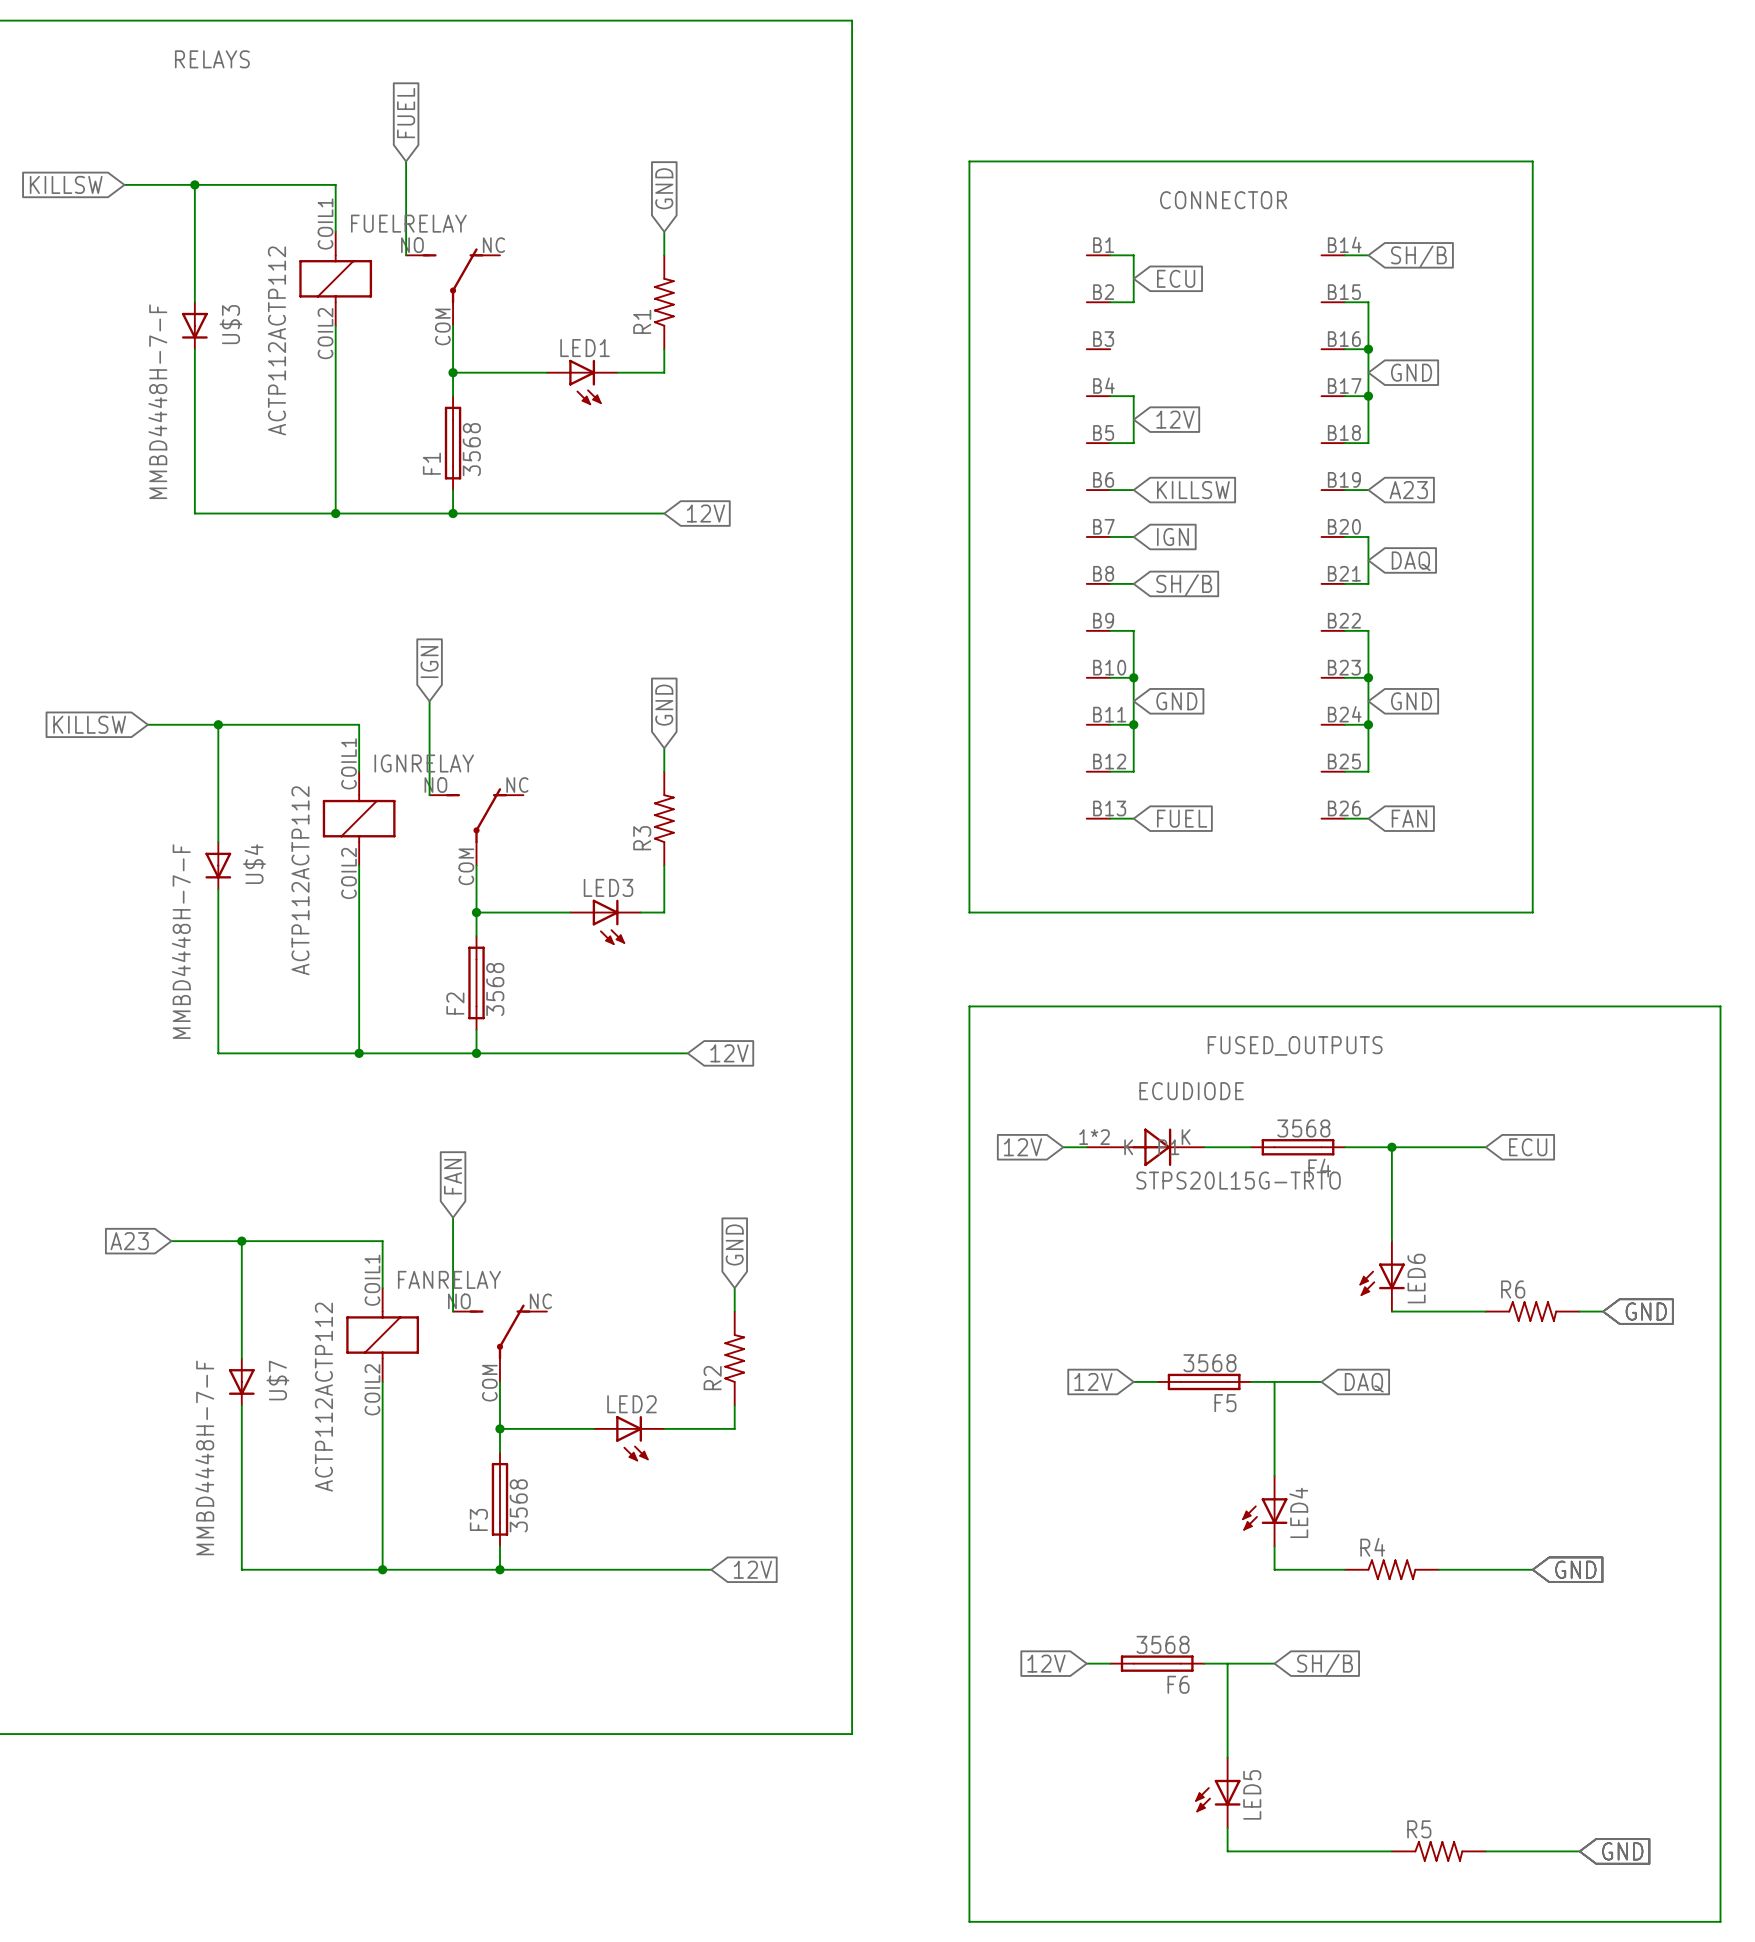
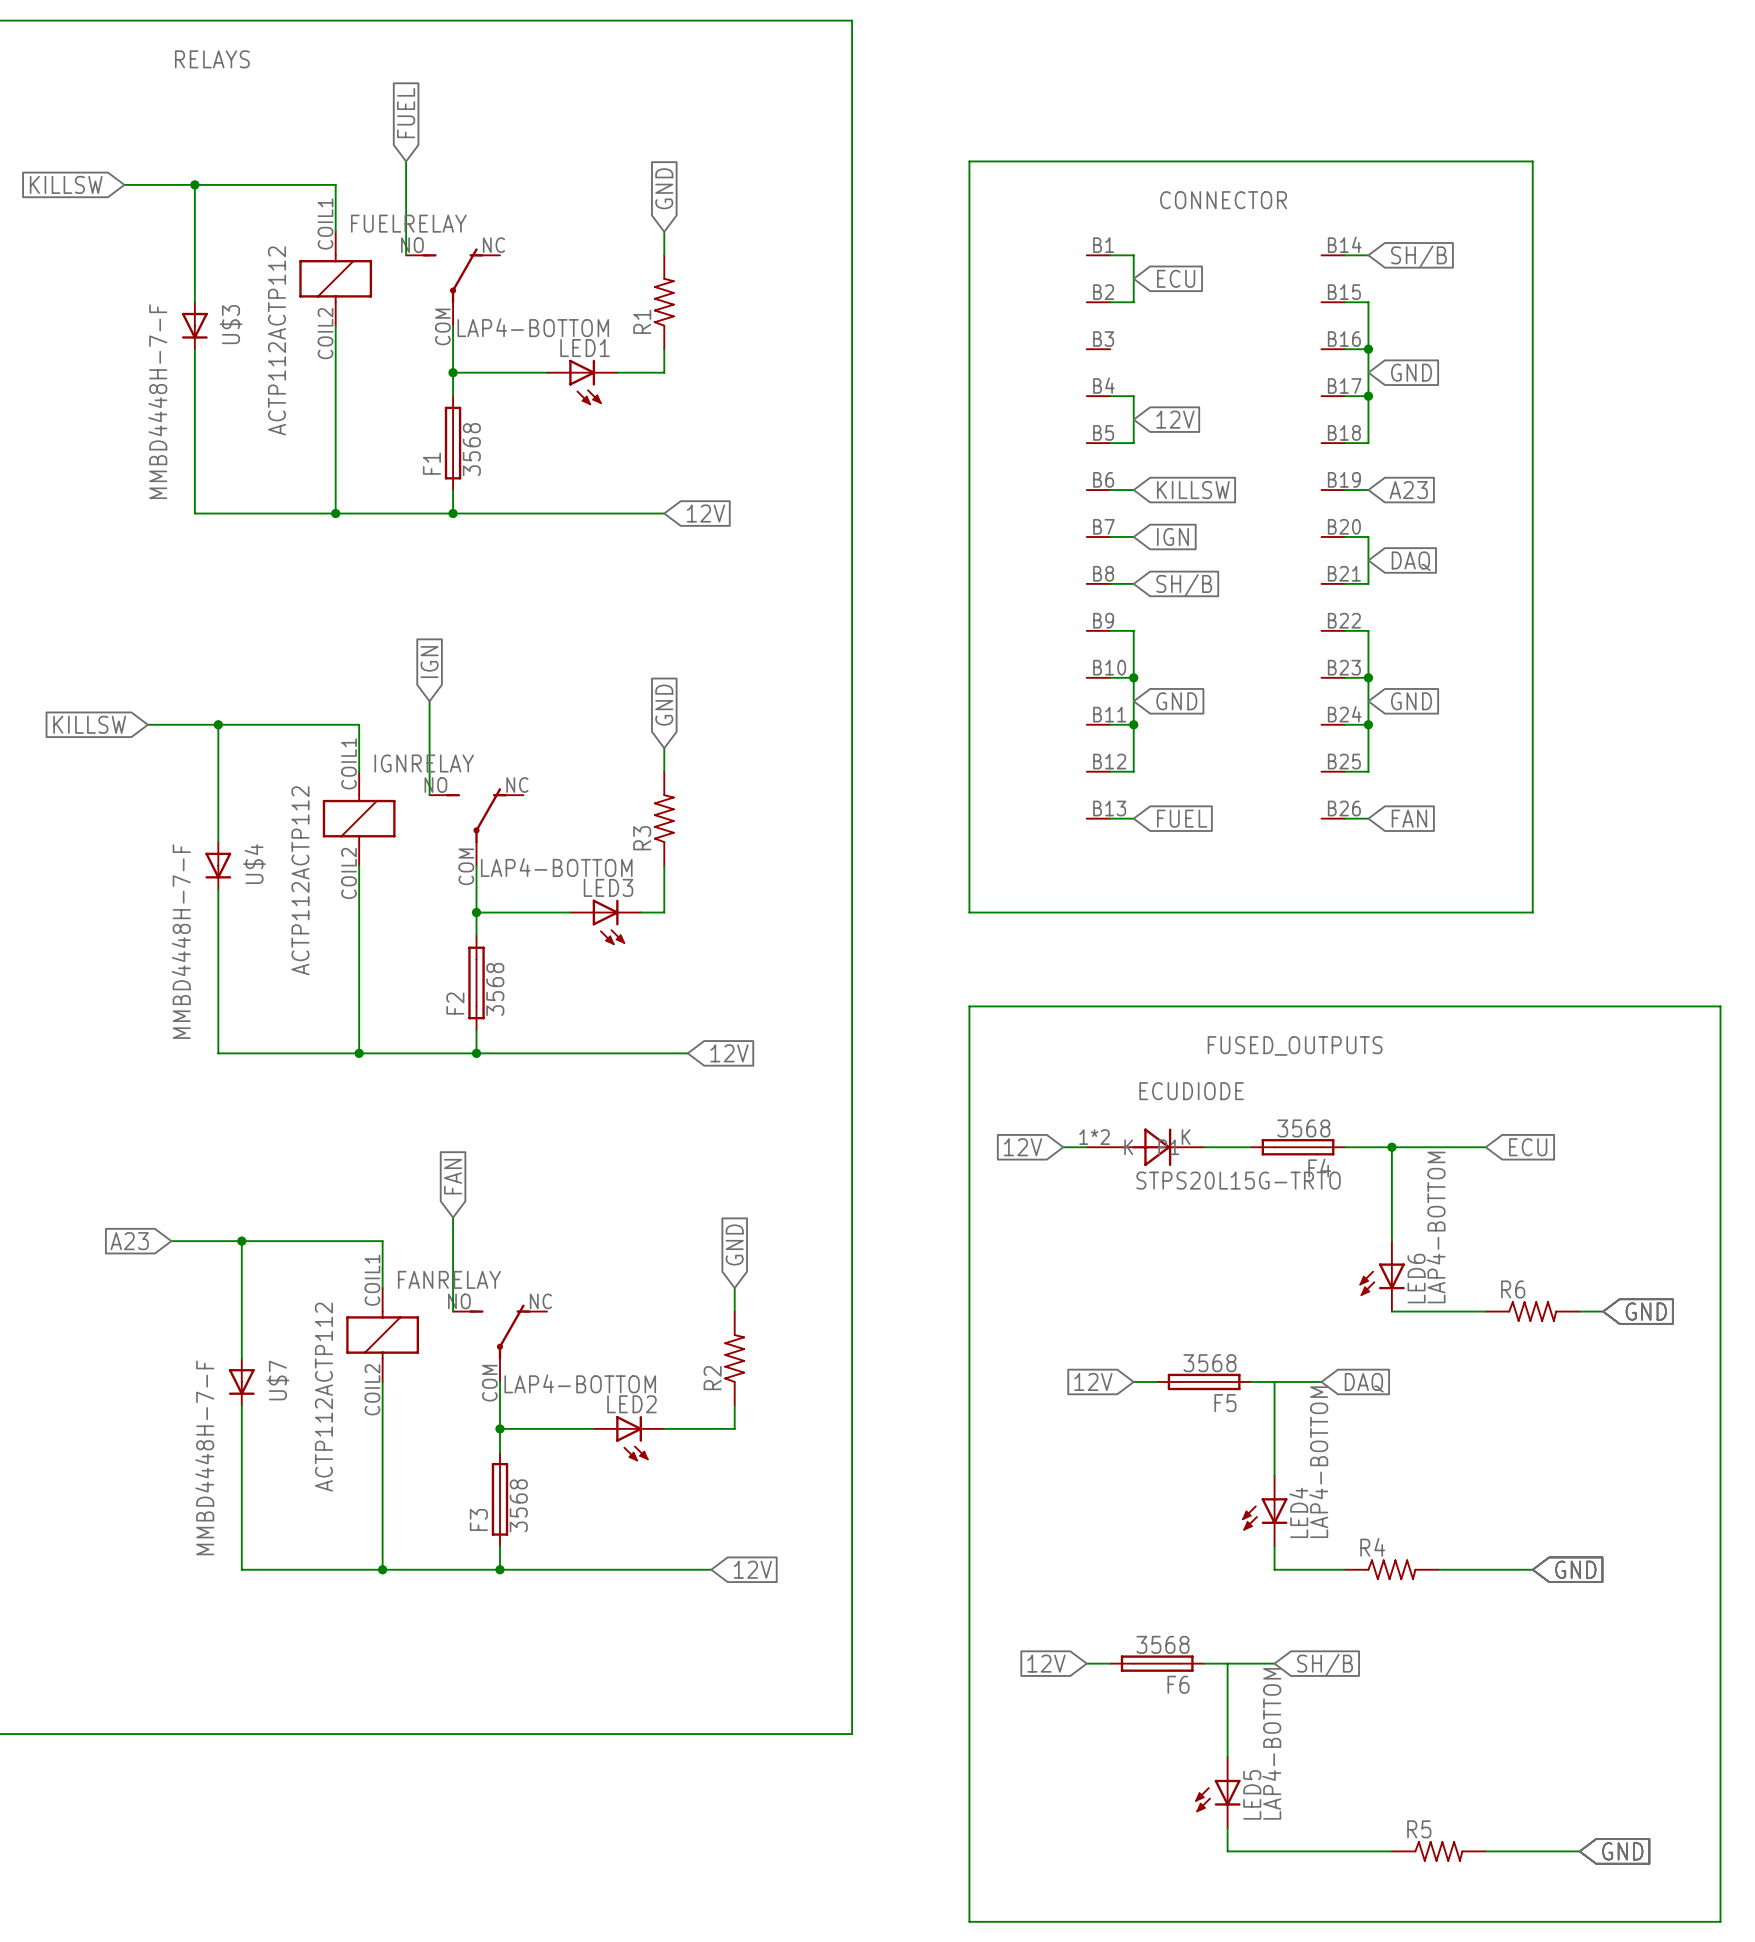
LED1 value: none -> LAP4-BOTTOM (533, 327)
LED3 value: none -> LAP4-BOTTOM (556, 867)
LED6 value: none -> LAP4-BOTTOM (1436, 1227)
LED2 value: none -> LAP4-BOTTOM (580, 1383)
LED4 value: none -> LAP4-BOTTOM (1318, 1462)
LED5 value: none -> LAP4-BOTTOM (1271, 1743)

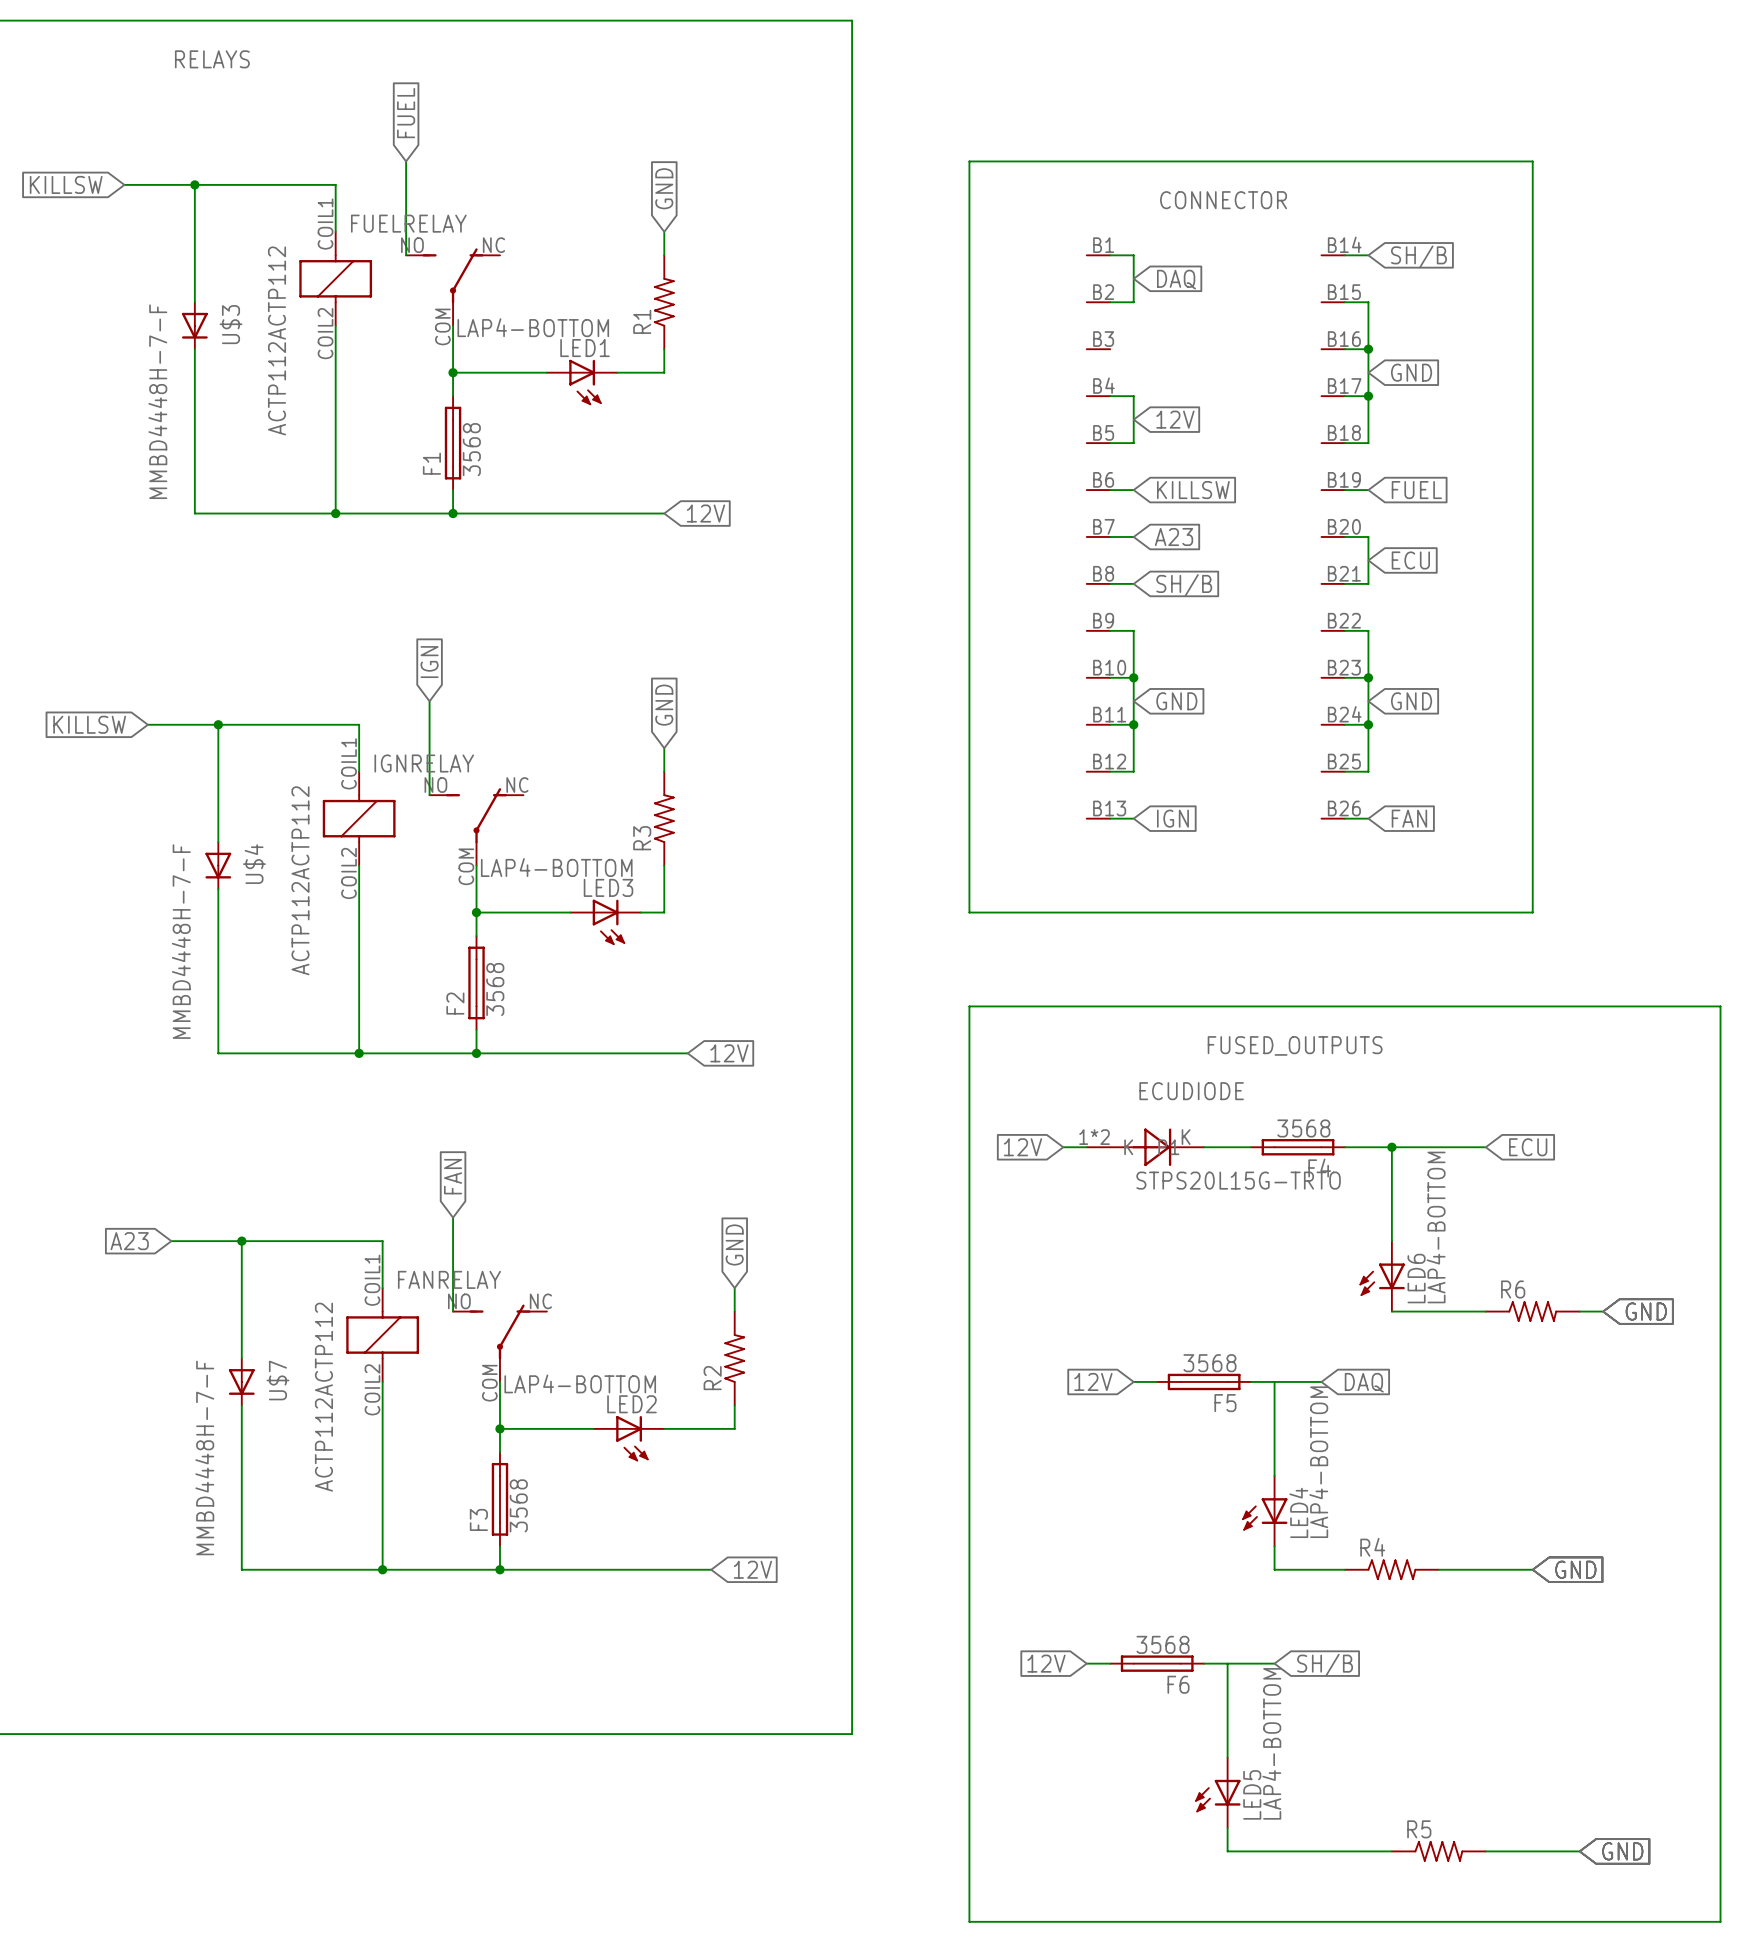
global label: ECU (1176, 278) -> DAQ (1176, 279)
global label: A23 (1408, 490) -> FUEL (1416, 490)
global label: IGN (1172, 536) -> A23 (1174, 536)
global label: DAQ (1411, 561) -> ECU (1410, 560)
global label: FUEL (1182, 818) -> IGN (1172, 818)

